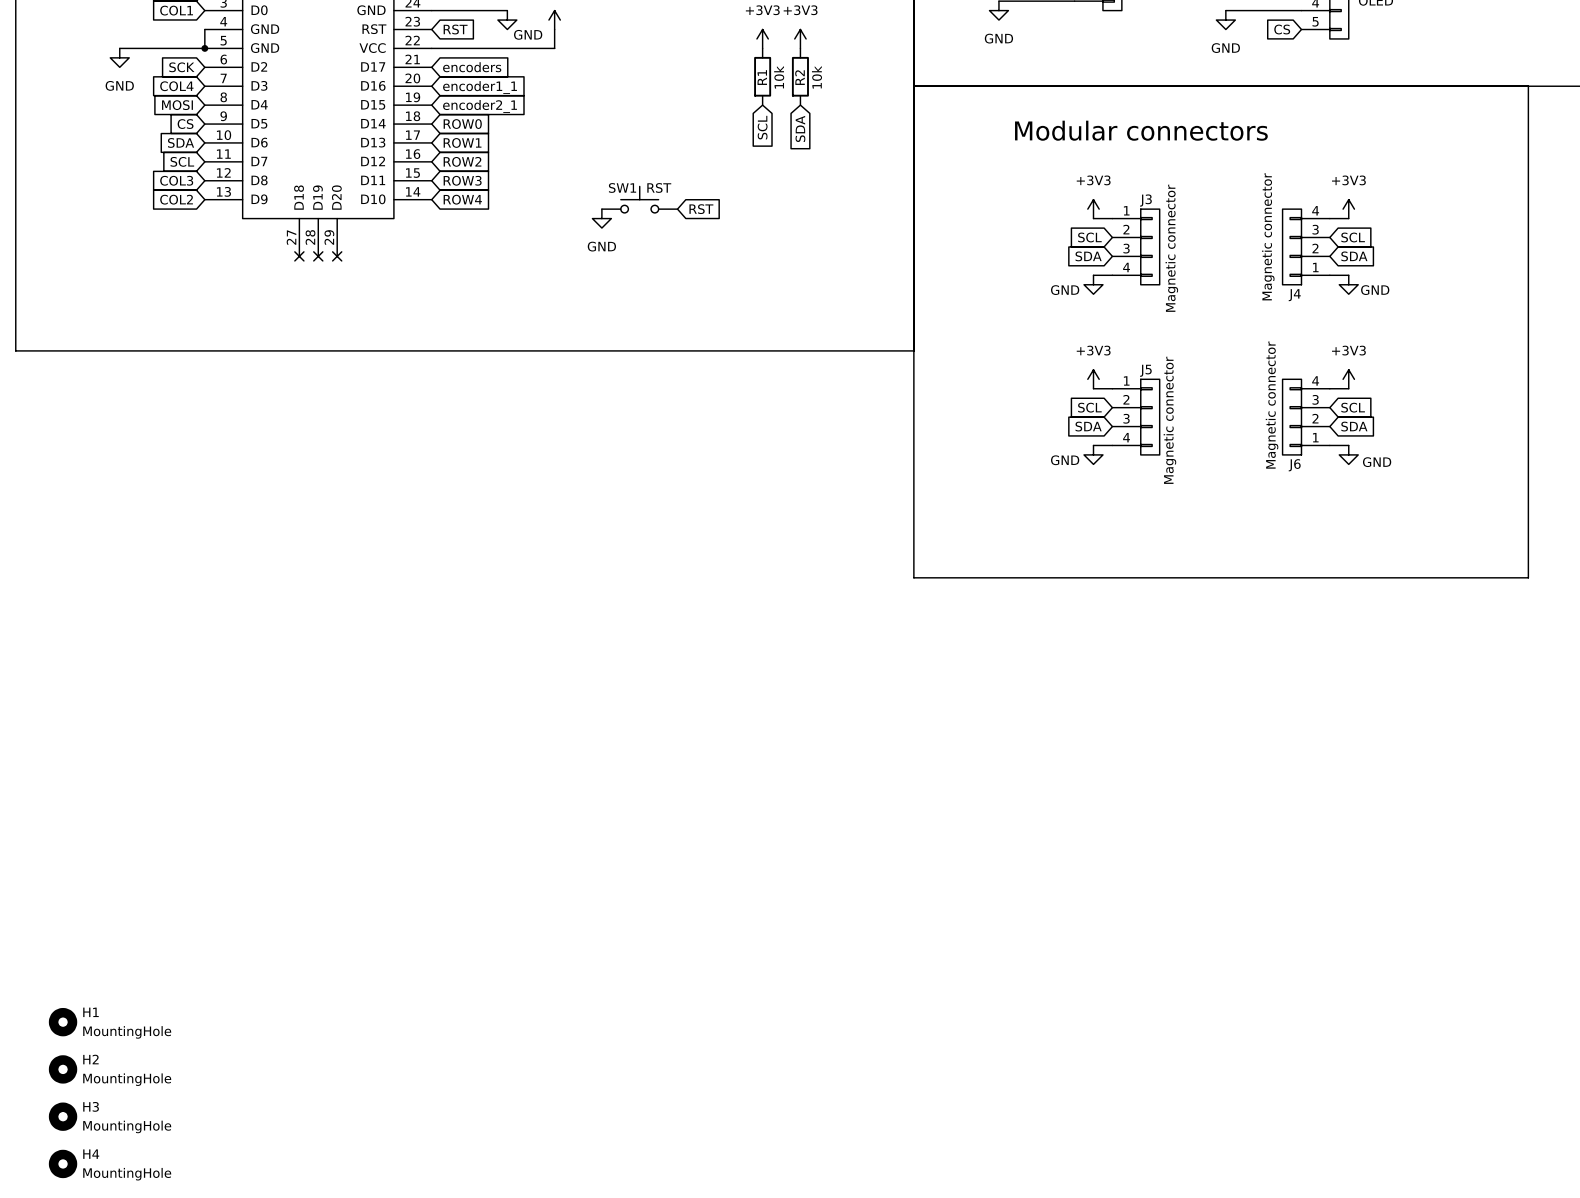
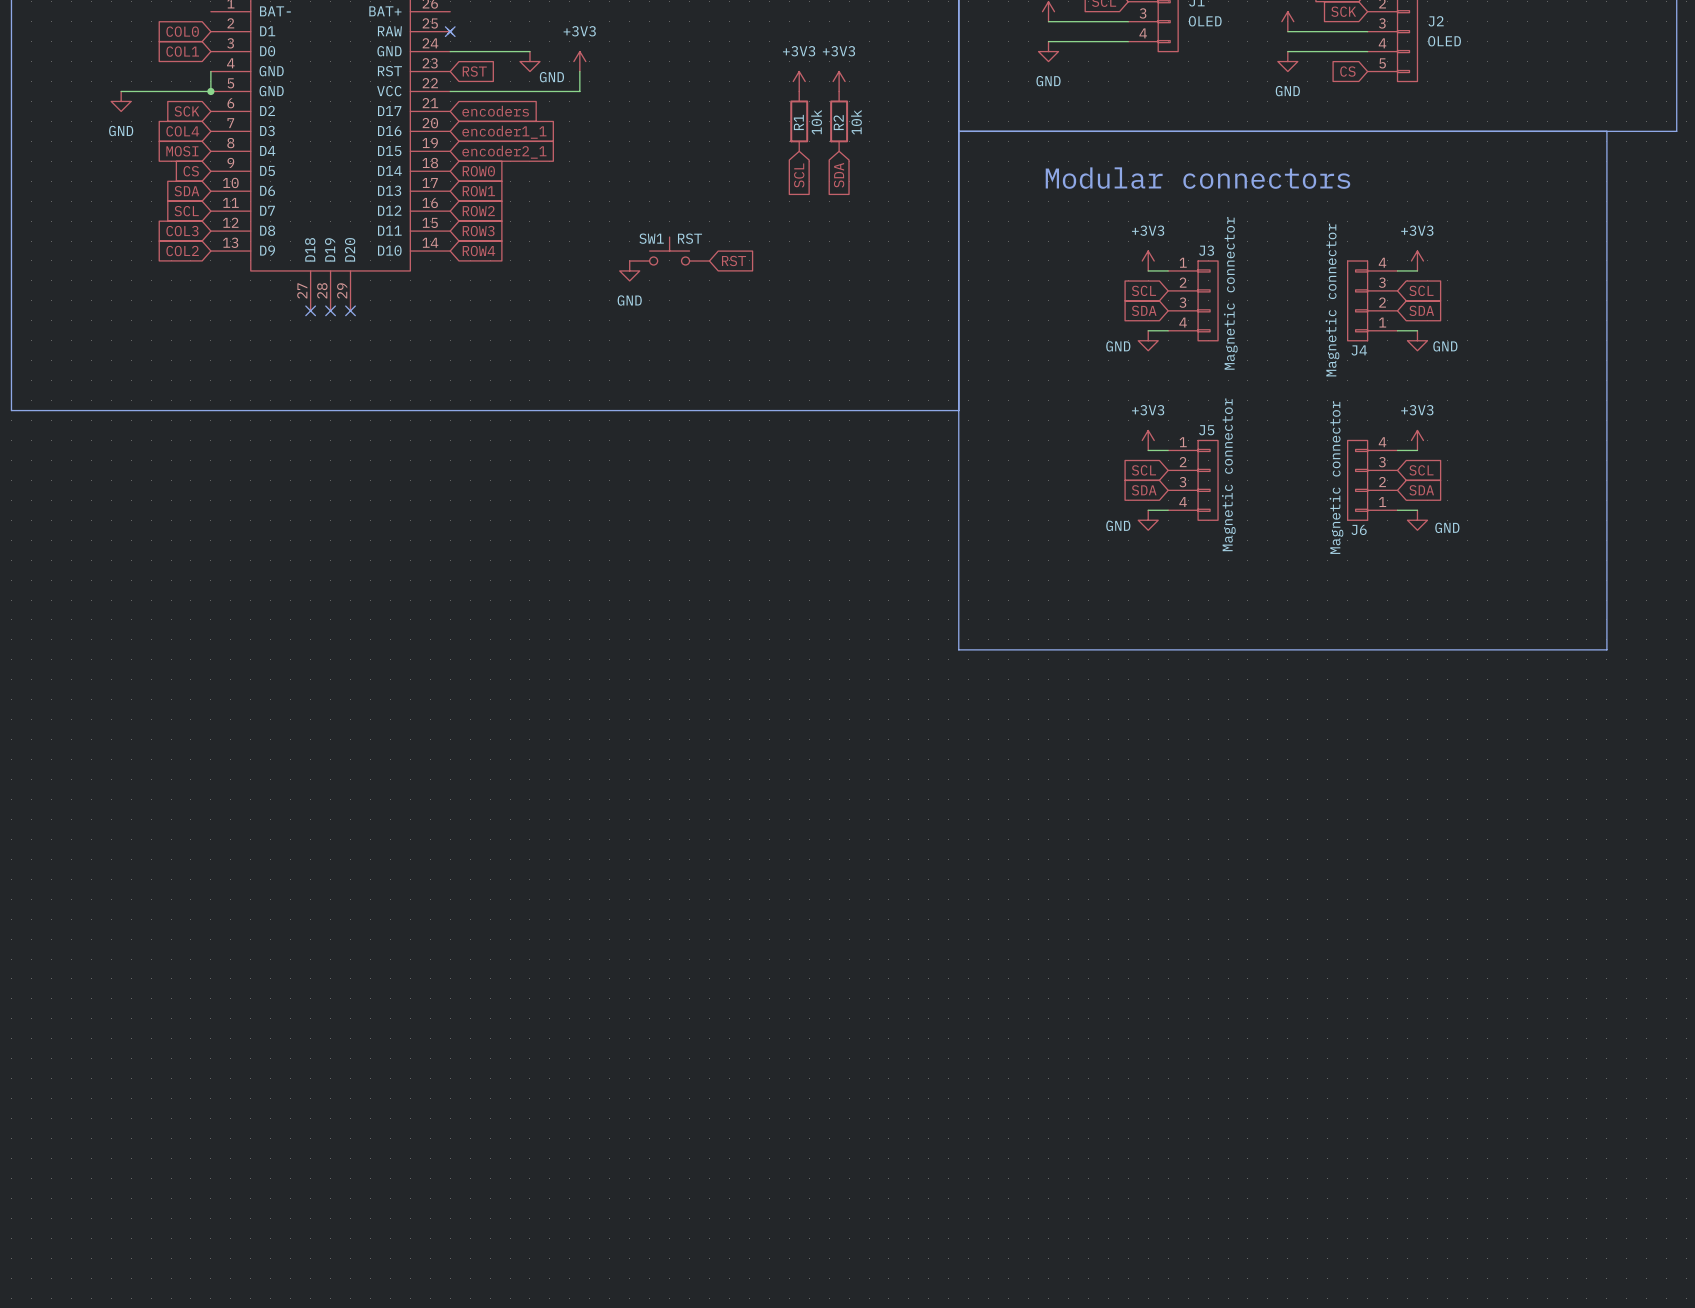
H1: MountingHole (63, 1022) -> none
H2: MountingHole (63, 1069) -> none
H3: MountingHole (63, 1116) -> none
H4: MountingHole (63, 1163) -> none

